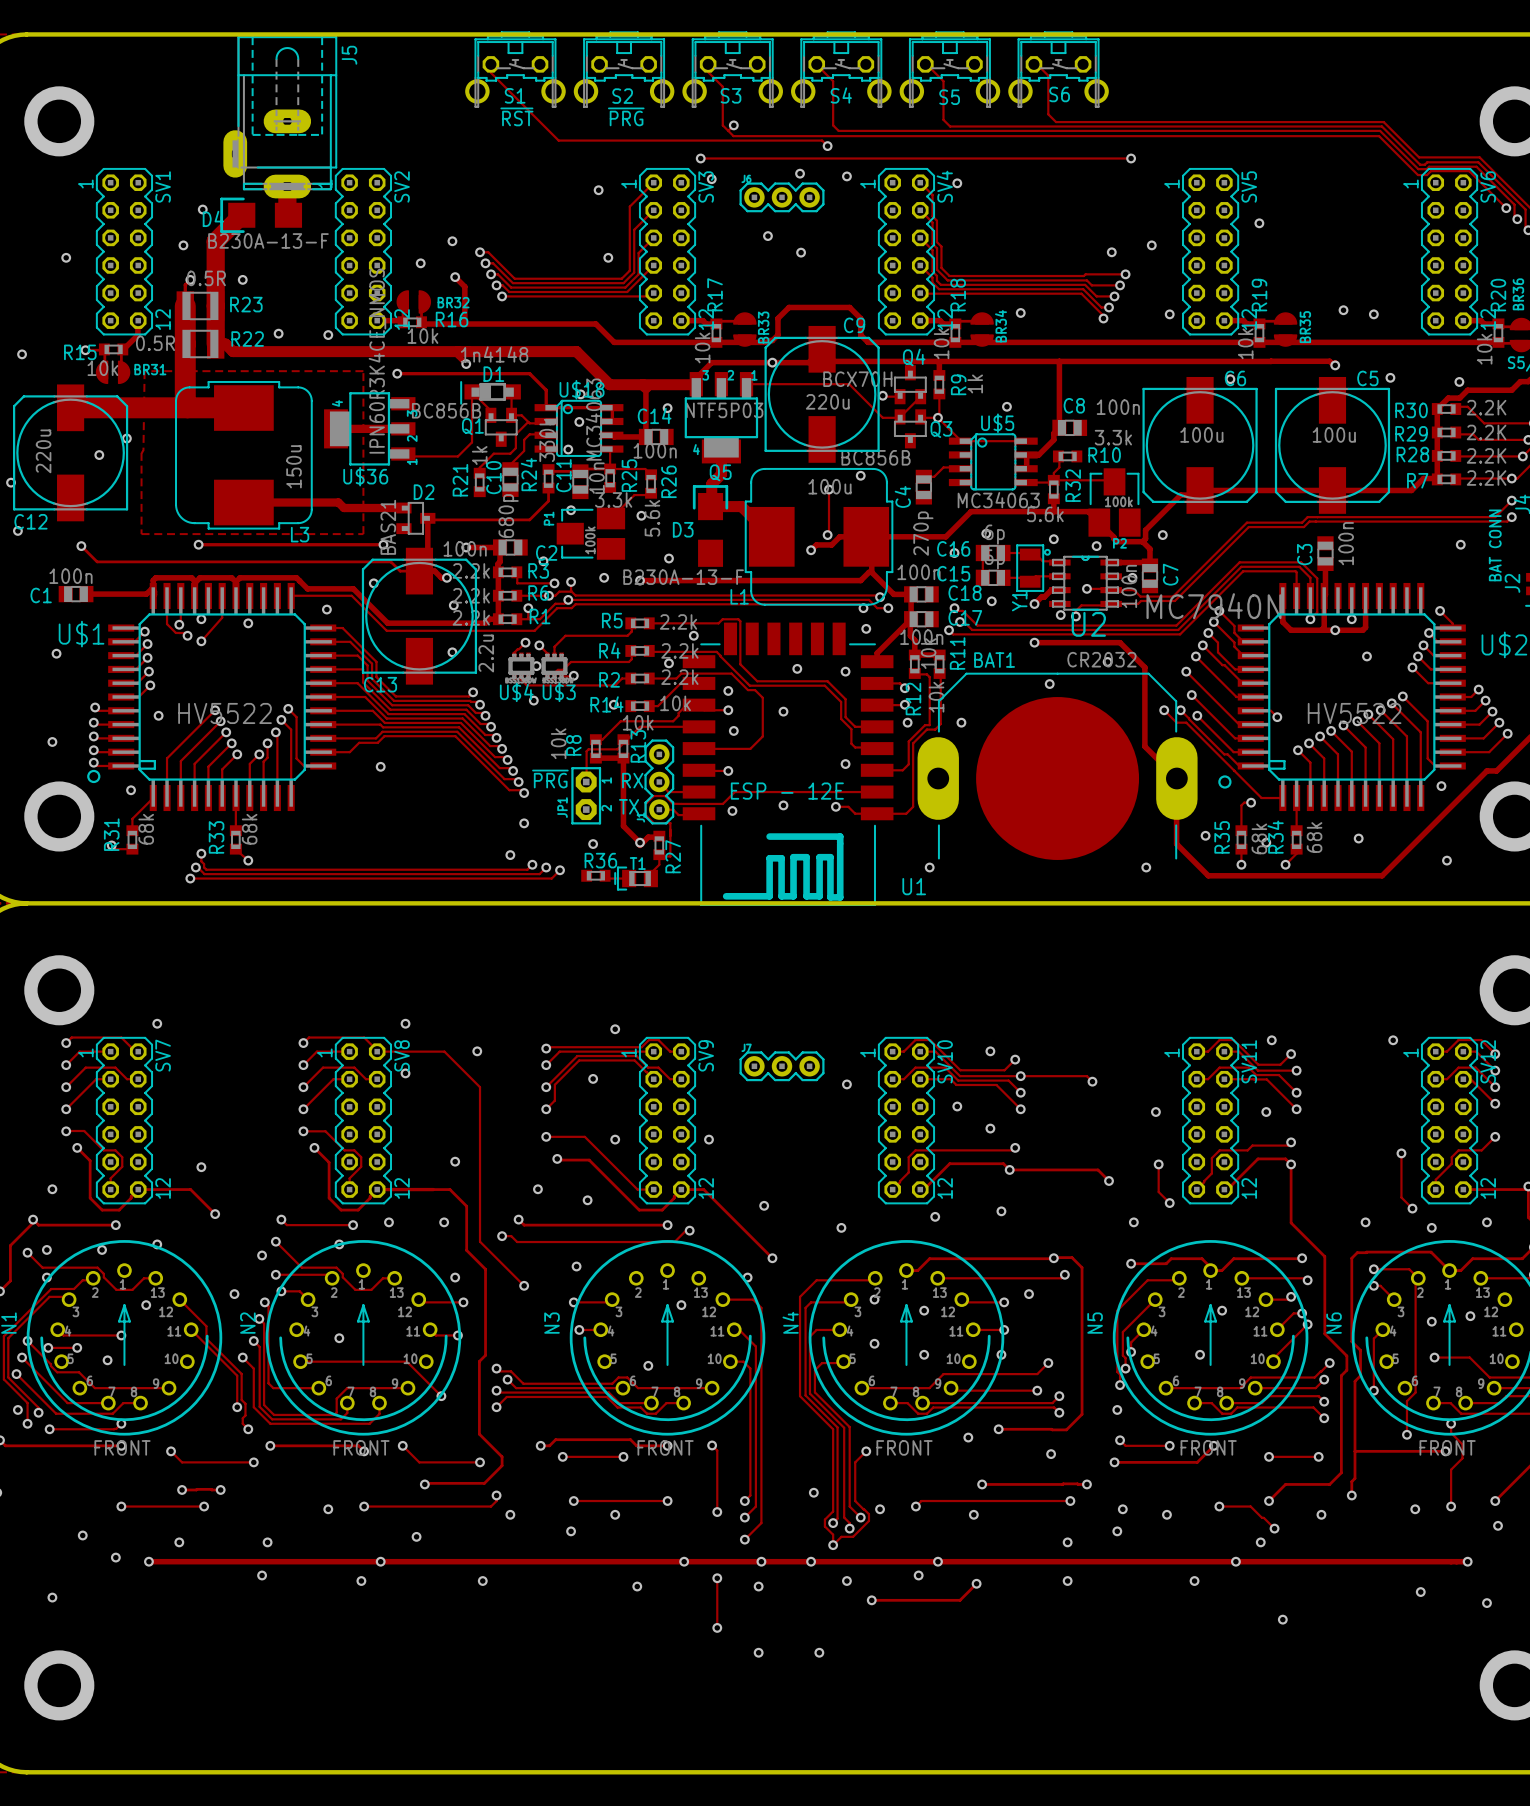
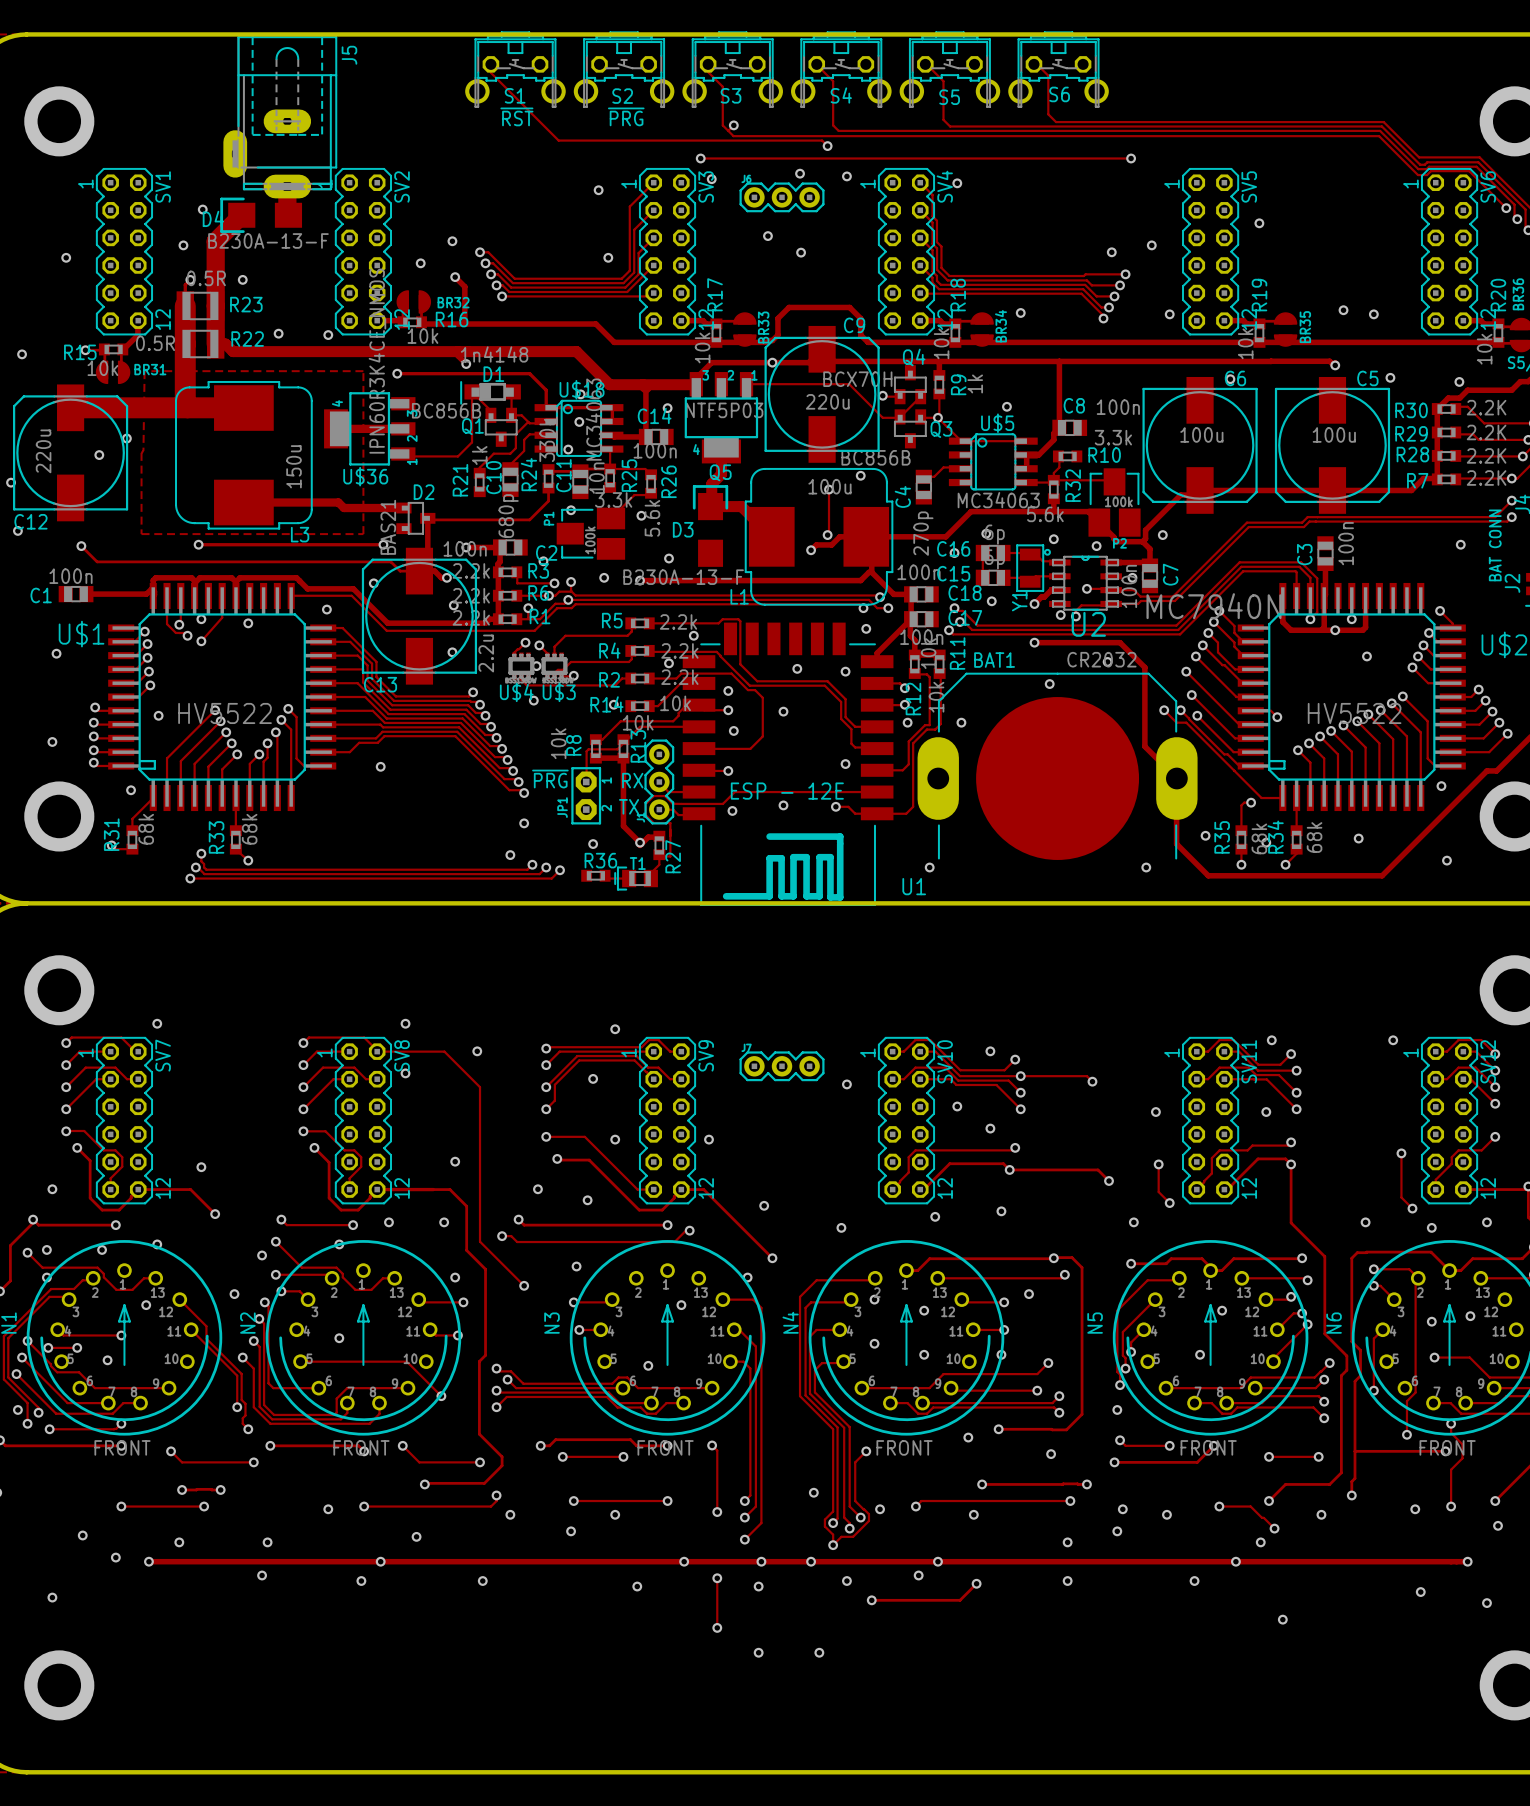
drawing: [87, 769, 101, 784] -> none
drawing: [1218, 775, 1232, 789] -> none

